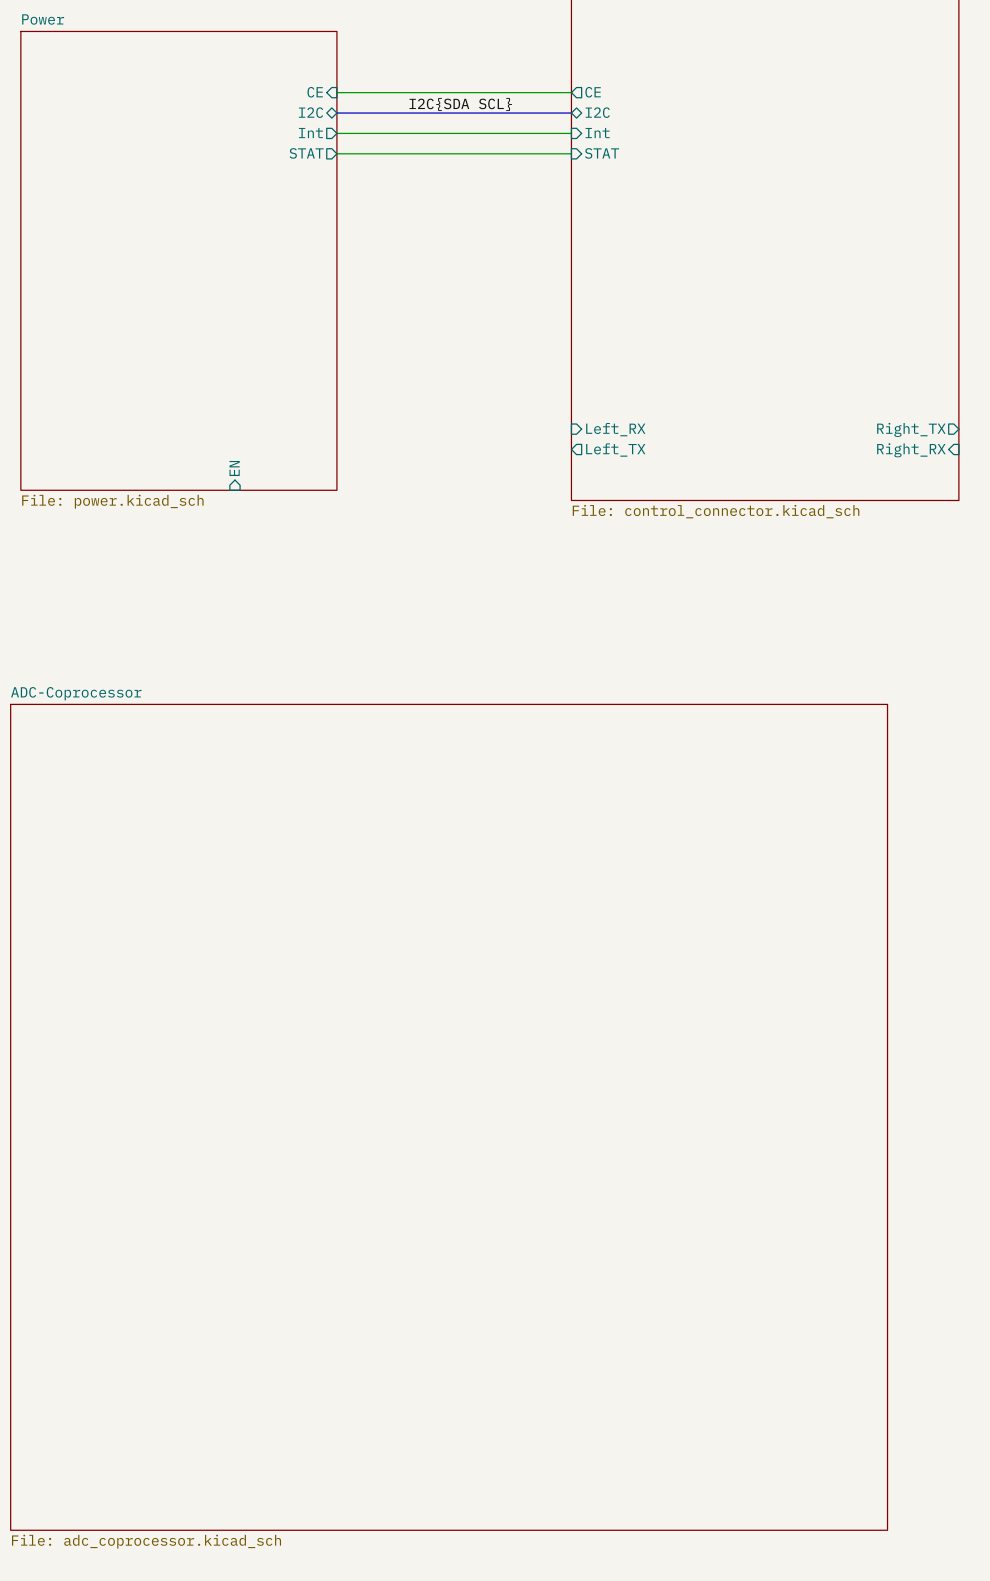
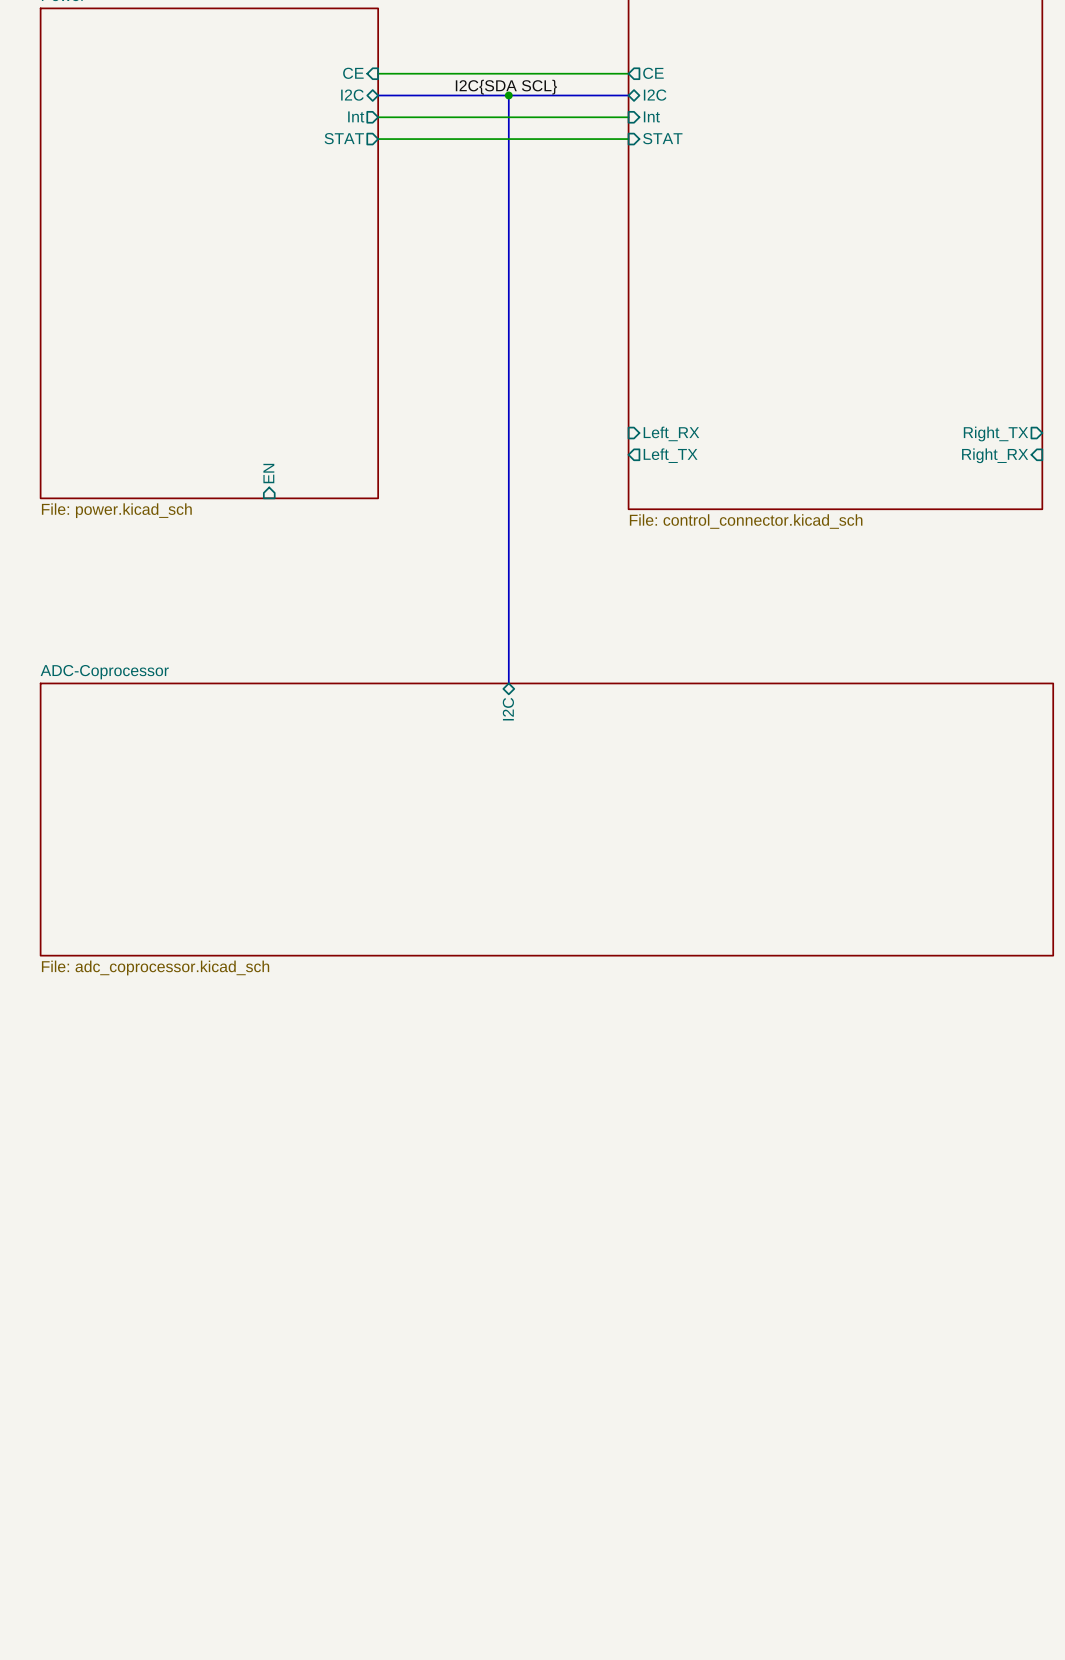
bus: none -> (508, 95) (508, 683)
junction: none -> (508, 95)
sheet pin: none -> I2C (508, 709)
sheet ADC-Coprocessor: none -> File: adc_coprocessor.kicad_sch (546, 819)
sheet ADC-Coprocessor: File: adc_coprocessor.kicad_sch (449, 1117) -> none

